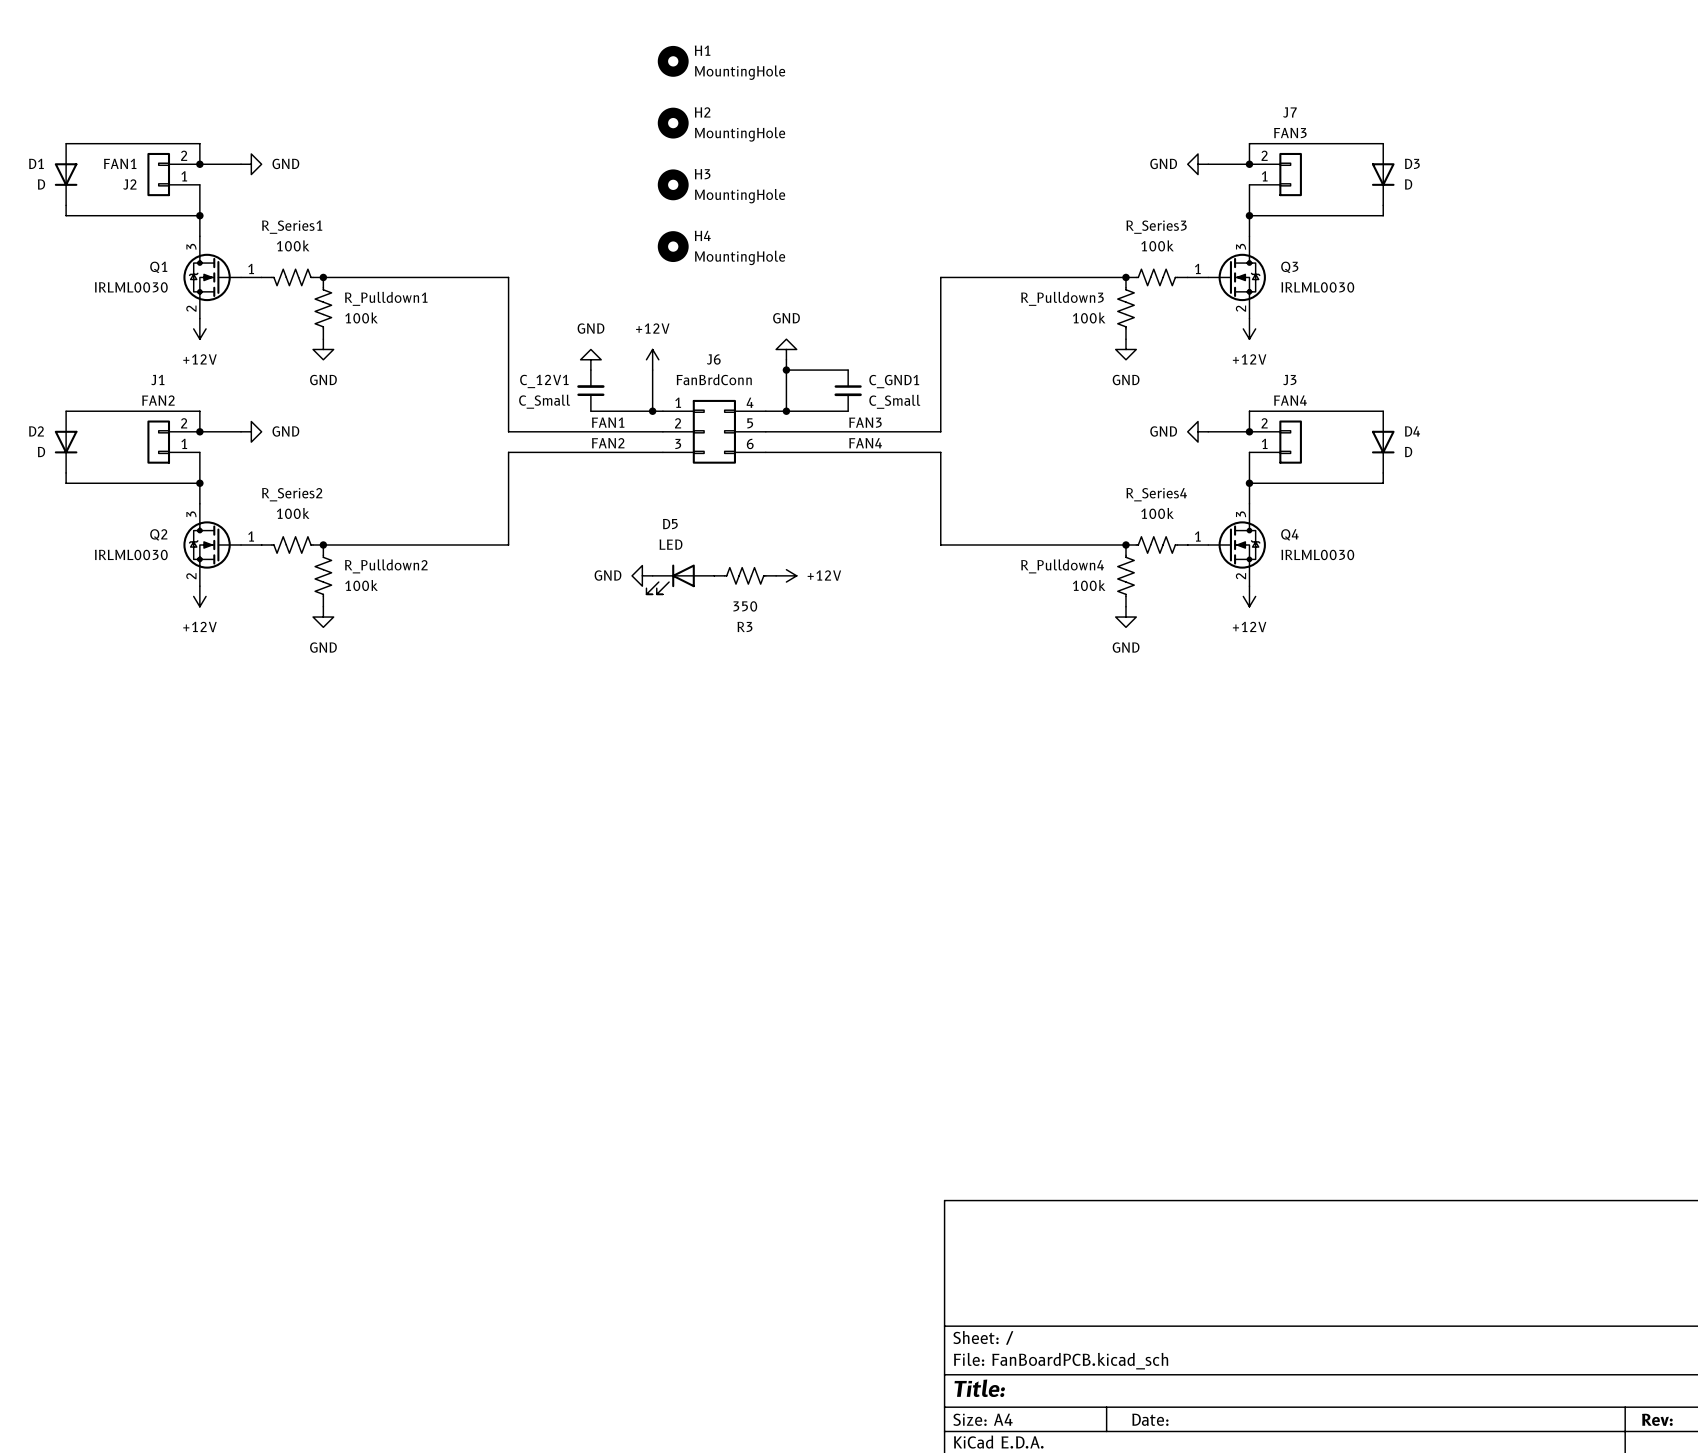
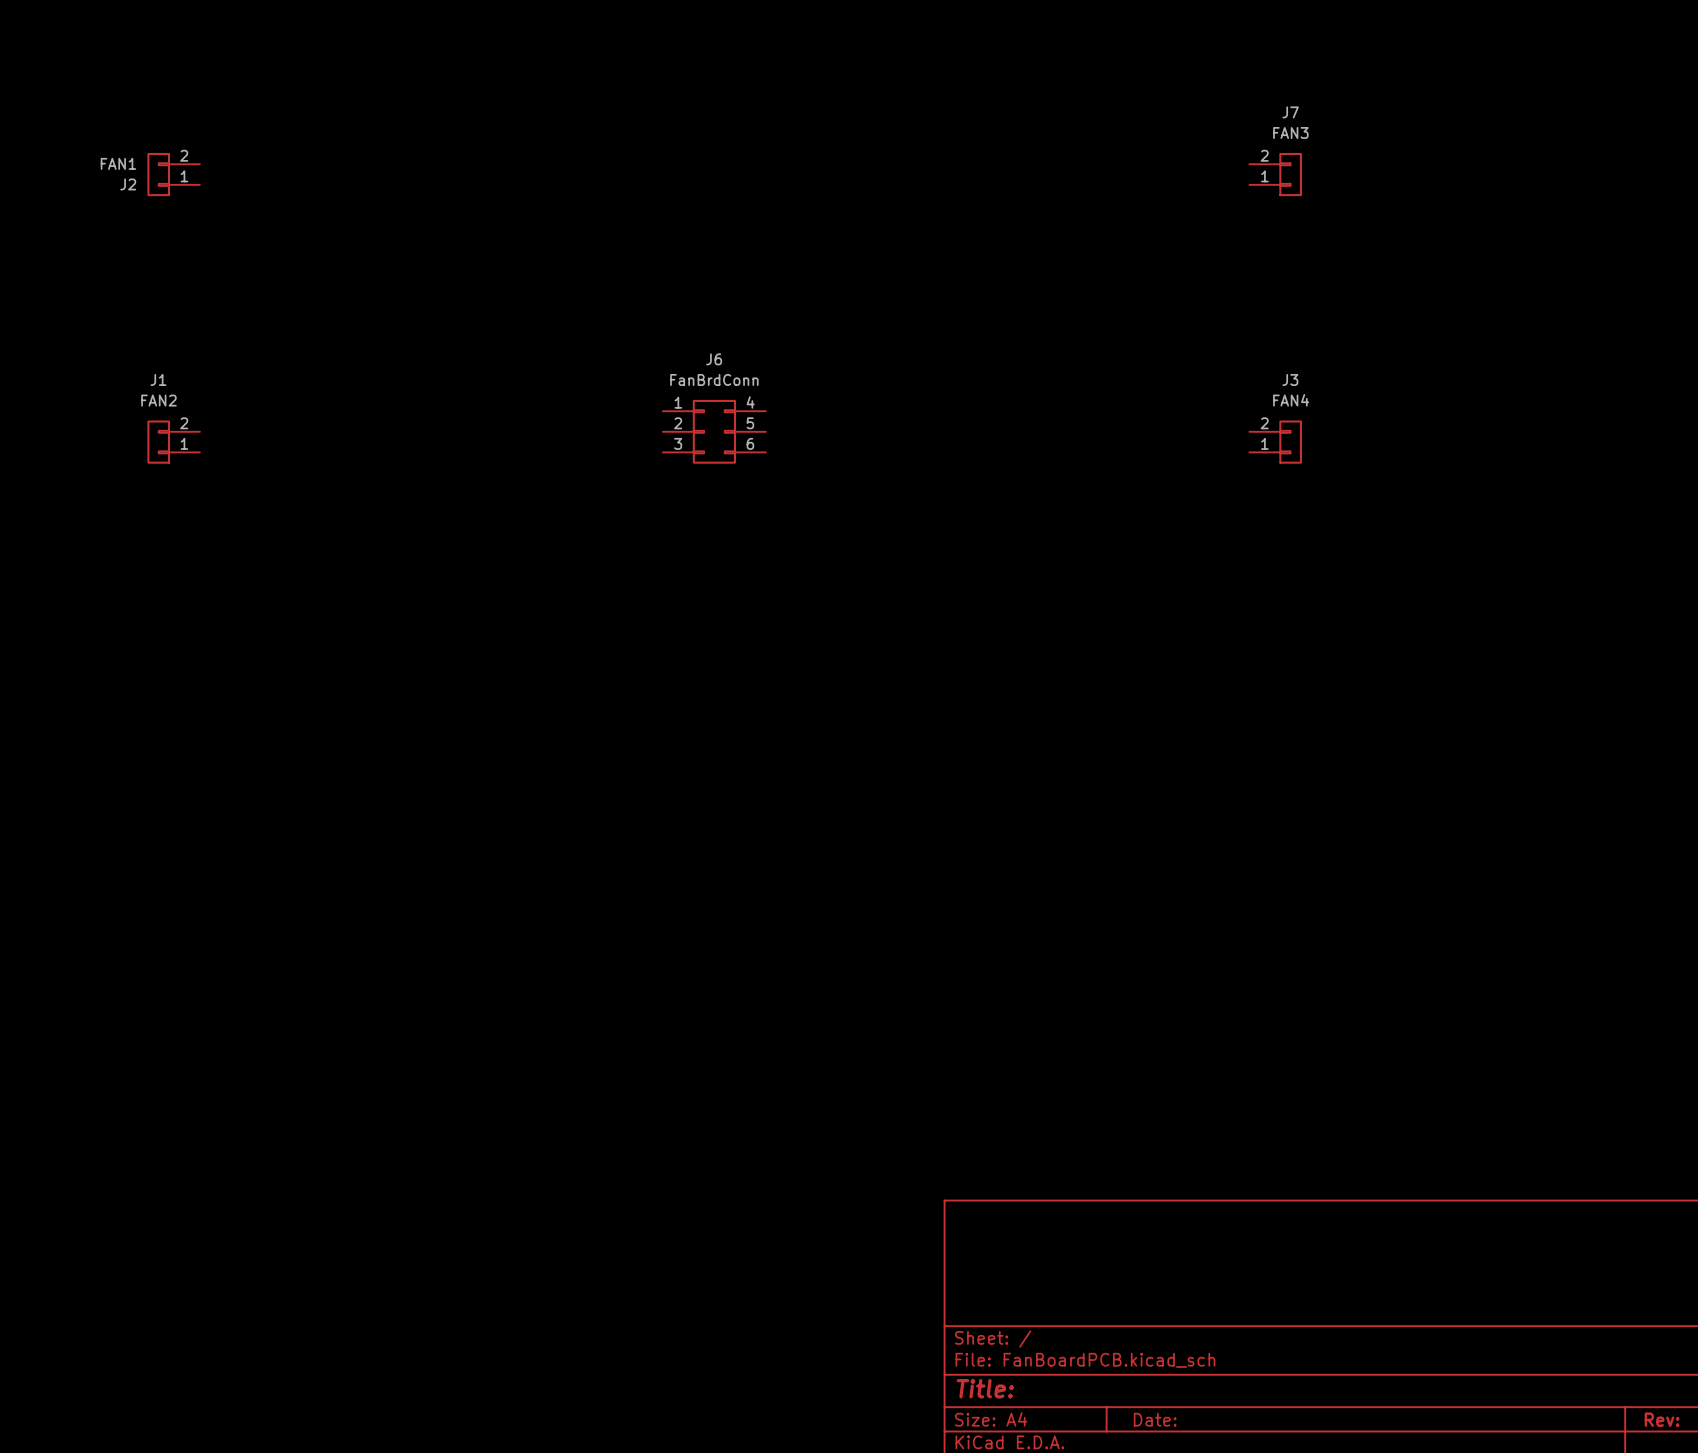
H1: MountingHole (673, 61) -> none
H2: MountingHole (673, 123) -> none
wire: (66, 143) (199, 143) (199, 164) (241, 164) -> none
wire: (1383, 143) (1249, 143) (1249, 164) (1208, 164) -> none
junction: (199, 164) -> none
power symbol: GND (251, 164) -> none
power symbol: GND (1198, 164) -> none
junction: (1249, 164) -> none
D1: D (66, 174) -> none
D3: D (1383, 174) -> none
wire: (199, 184) (199, 236) -> none
H3: MountingHole (673, 184) -> none
wire: (1249, 184) (1249, 236) -> none
wire: (66, 205) (66, 215) (199, 215) -> none
wire: (1383, 205) (1383, 215) (1249, 215) -> none
junction: (199, 215) -> none
junction: (1249, 215) -> none
H4: MountingHole (673, 246) -> none
Q1: IRLML0030 (222, 277) -> none
R_Series1: 100k (292, 277) -> none
wire: (323, 277) (508, 277) (508, 431) (662, 431) -> none
junction: (323, 277) -> none
wire: (1125, 277) (940, 277) (940, 431) (765, 431) -> none
junction: (1125, 277) -> none
R_Series3: 100k (1156, 277) -> none
Q3: IRLML0030 (1226, 277) -> none
R_Pulldown1: 100k (323, 308) -> none
R_Pulldown3: 100k (1125, 308) -> none
power symbol: +12V (199, 328) -> none
power symbol: +12V (1249, 328) -> none
power symbol: GND (323, 349) -> none
power symbol: GND (786, 349) -> none
power symbol: GND (1125, 349) -> none
power symbol: GND (590, 359) -> none
power symbol: +12V (652, 359) -> none
wire: (786, 359) (786, 411) -> none
wire: (652, 370) (652, 411) -> none
wire: (786, 370) (848, 370) -> none
junction: (786, 370) -> none
C_12V1: C_Small (590, 390) -> none
C_GND1: C_Small (848, 390) -> none
wire: (66, 411) (199, 411) (199, 431) (241, 431) -> none
wire: (590, 411) (662, 411) -> none
junction: (652, 411) -> none
wire: (765, 411) (848, 411) -> none
junction: (786, 411) -> none
wire: (1383, 411) (1249, 411) (1249, 431) (1208, 431) -> none
label: FAN1 (608, 422) -> none
label: FAN3 (865, 422) -> none
junction: (199, 431) -> none
power symbol: GND (251, 431) -> none
power symbol: GND (1198, 431) -> none
junction: (1249, 431) -> none
D2: D (66, 442) -> none
D4: D (1383, 442) -> none
label: FAN2 (608, 443) -> none
label: FAN4 (865, 443) -> none
wire: (199, 452) (199, 503) -> none
wire: (662, 452) (508, 452) (508, 544) (323, 544) -> none
wire: (765, 452) (940, 452) (940, 544) (1125, 544) -> none
wire: (1249, 452) (1249, 503) -> none
wire: (66, 472) (66, 483) (199, 483) -> none
wire: (1383, 472) (1383, 483) (1249, 483) -> none
junction: (199, 483) -> none
junction: (1249, 483) -> none
Q2: IRLML0030 (222, 544) -> none
R_Series2: 100k (292, 544) -> none
junction: (323, 544) -> none
junction: (1125, 544) -> none
R_Series4: 100k (1156, 544) -> none
Q4: IRLML0030 (1226, 544) -> none
R_Pulldown2: 100k (323, 575) -> none
power symbol: GND (642, 575) -> none
R3: 350 (745, 575) -> none
power symbol: +12V (786, 575) -> none
R_Pulldown4: 100k (1125, 575) -> none
D5: LED (680, 579) -> none
power symbol: +12V (199, 596) -> none
power symbol: +12V (1249, 596) -> none
power symbol: GND (323, 617) -> none
power symbol: GND (1125, 617) -> none

